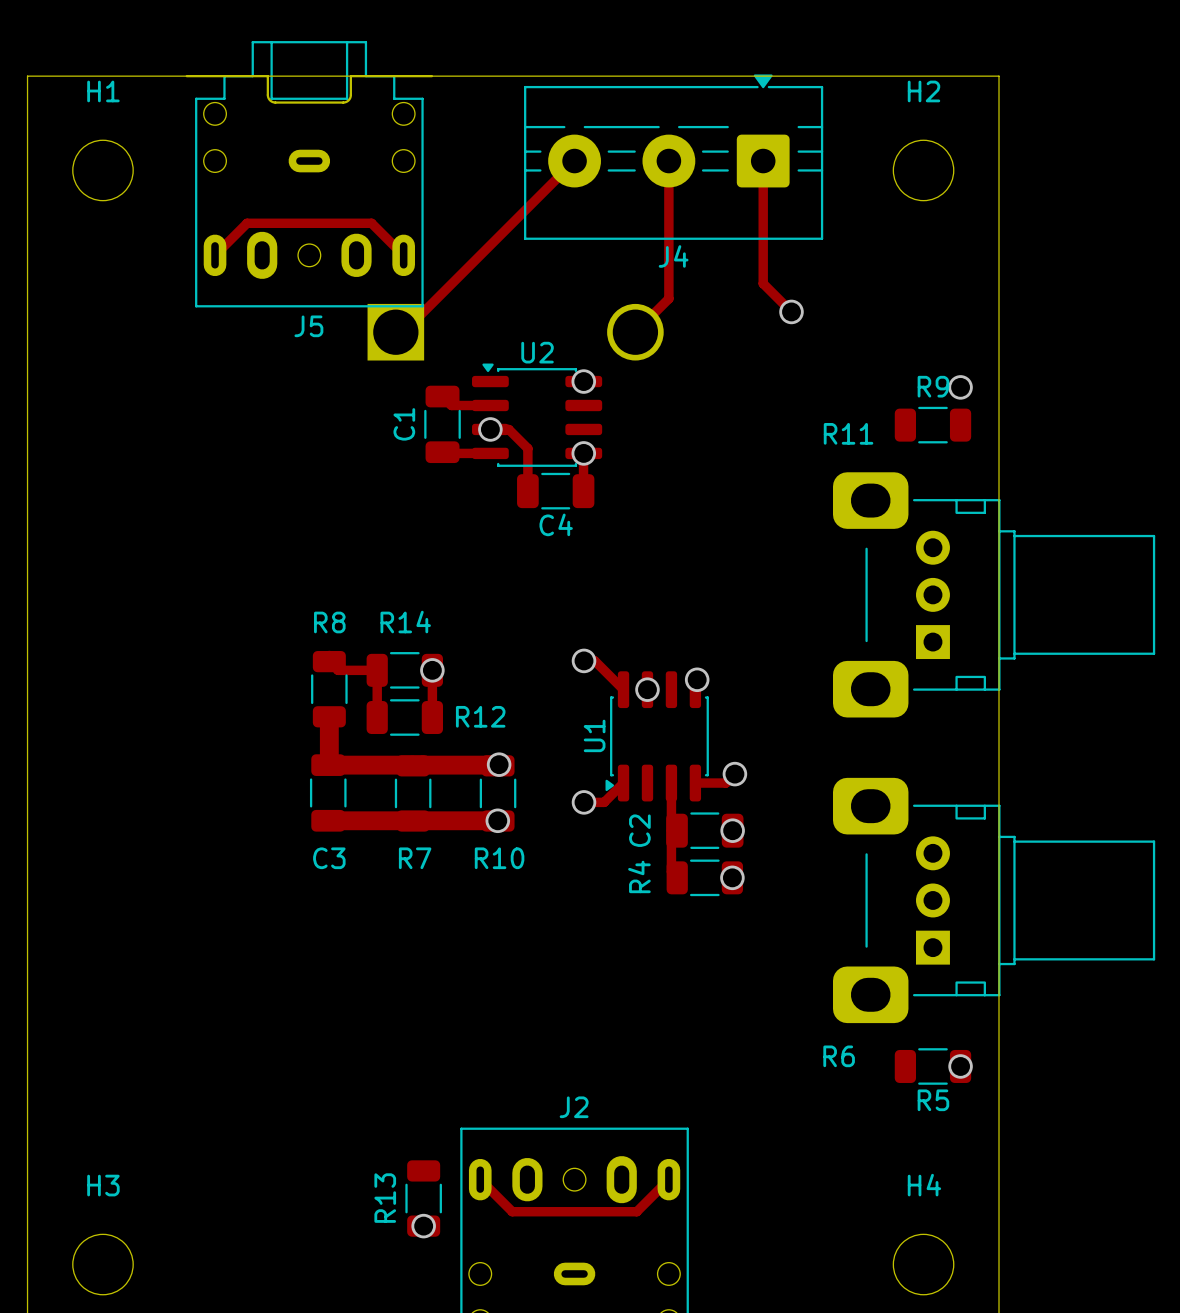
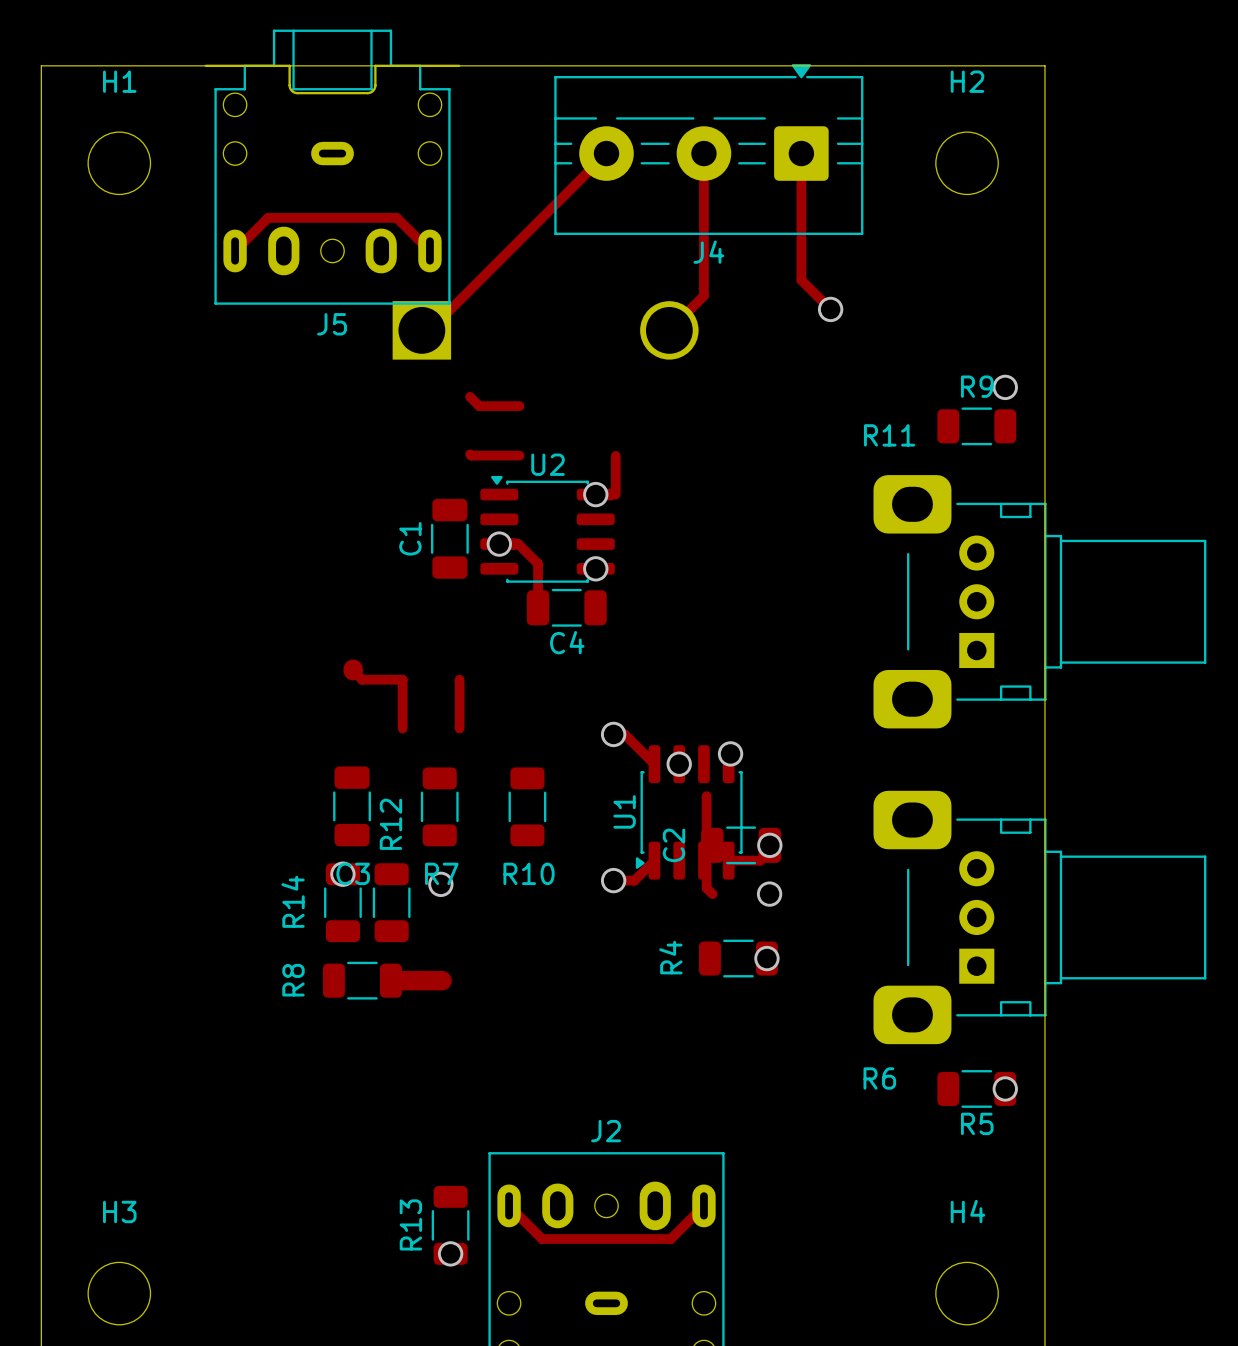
via: (583, 381) -> none
U2 position: (537, 415) -> (547, 529)
C1 position: (442, 424) -> (449, 538)
track: (490, 429) (508, 429) (527, 448) (527, 491) -> (499, 544) (518, 544) (538, 563) (538, 607)
via: (490, 429) -> none
via position: (583, 453) -> (595, 494)
C4 position: (555, 491) -> (566, 607)
via: none -> (499, 544)
via: none -> (595, 568)
R8 name position: R8 (329, 622) -> R8 (293, 980)
R14 name position: R14 (405, 622) -> R14 (293, 901)
track: (584, 660) (594, 660) (623, 689) -> (613, 734) (624, 734) (654, 764)
via: (584, 660) -> none
R14 rotation: 0° (404, 670) -> 90° clockwise (342, 902)
R14 position: (404, 670) -> (342, 902)
via: (432, 670) -> none
via: (697, 679) -> none
R8 rotation: 0° (329, 689) -> 90° clockwise (362, 980)
R8 position: (329, 689) -> (362, 980)
via: (647, 689) -> none
track: (329, 716) (329, 766) -> none
R12 name position: R12 (480, 716) -> R12 (390, 824)
R12 rotation: 0° (404, 717) -> 90° clockwise (391, 902)
R12 position: (404, 717) -> (391, 902)
via: none -> (613, 734)
U1 position: (657, 736) -> (689, 812)
via: none -> (730, 753)
via: none -> (679, 764)
via: (499, 764) -> none
track: (328, 765) (497, 765) -> none
track: (734, 774) (725, 783) (695, 783) -> (769, 851) (760, 860) (728, 860)
via: (734, 774) -> none
track: (623, 783) (604, 802) (584, 802) -> (654, 860) (634, 880) (613, 880)
via: (584, 802) -> none
track: (328, 820) (497, 820) -> none
via: (497, 820) -> none
via: none -> (342, 874)
via: none -> (613, 880)
via: none -> (440, 884)
R4 position: (704, 877) -> (738, 958)
via: none -> (766, 958)
track: none -> (390, 980) (442, 980)

